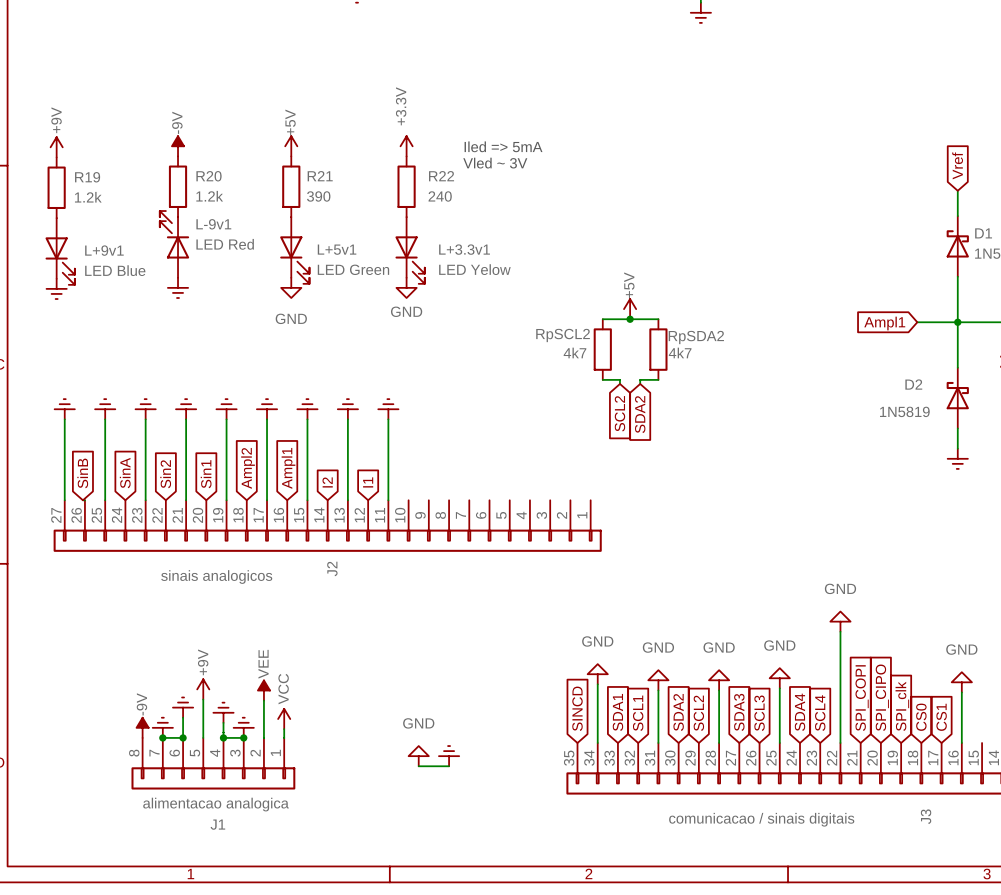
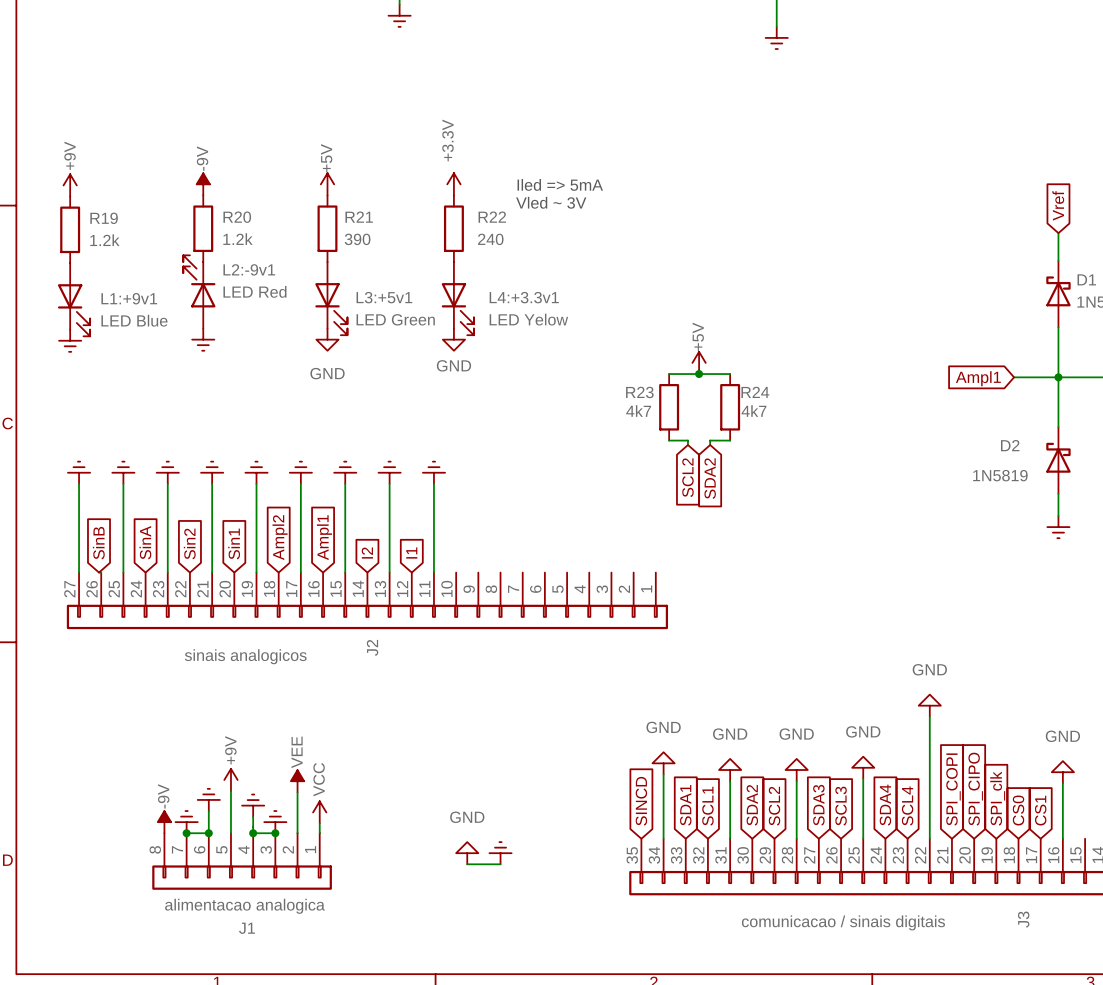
L-9v1 name: L-9v1 (213, 224) -> L2:-9v1 (249, 269)
L+5v1 name: L+5v1 (337, 249) -> L3:+5v1 (384, 297)
L+3.3v1 name: L+3.3v1 (464, 249) -> L4:+3.3v1 (524, 297)
L+9v1 name: L+9v1 (104, 250) -> L1:+9v1 (129, 298)
RpSCL2 name: RpSCL2 (563, 335) -> R23 (639, 392)
RpSDA2 name: RpSDA2 (696, 337) -> R24 (755, 392)

